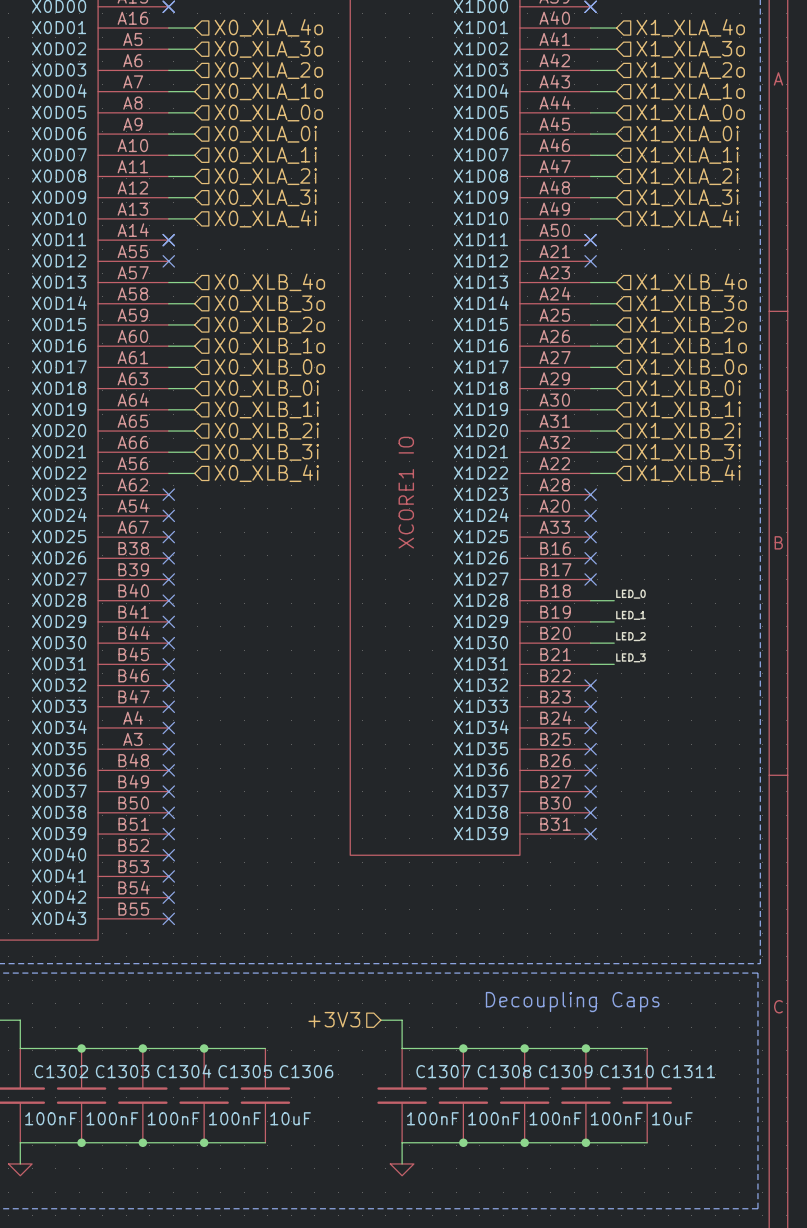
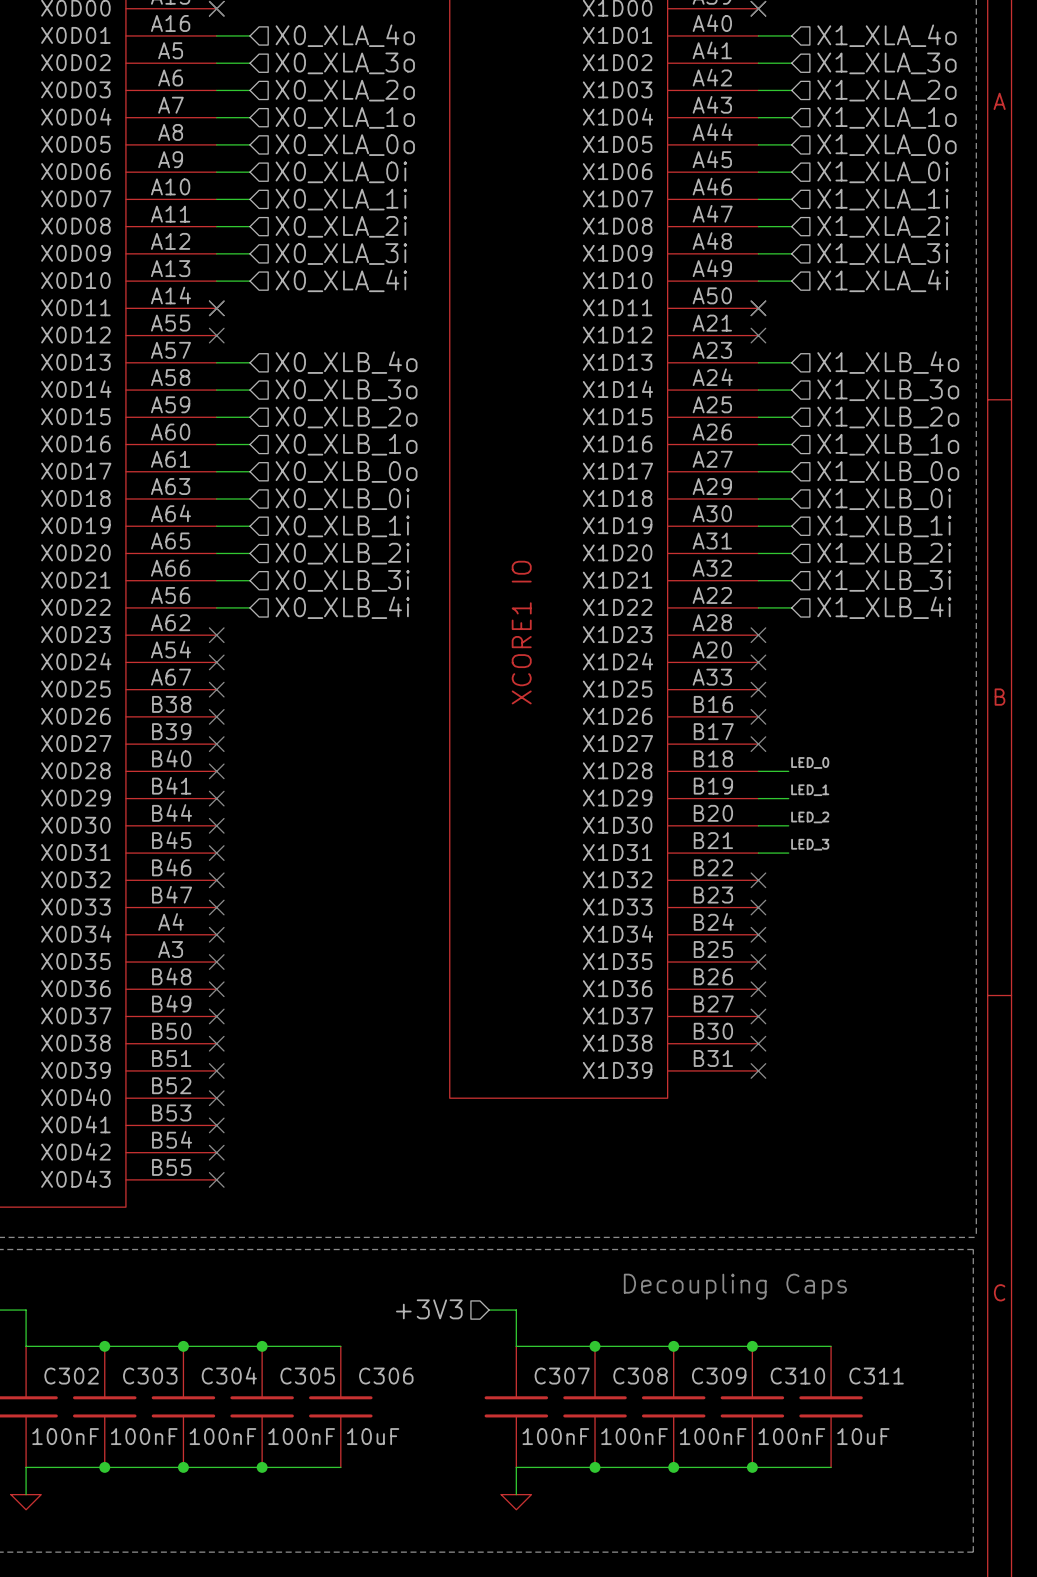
C1302 name: C1302 (61, 1071) -> C302 (71, 1376)
C1303 name: C1303 (122, 1071) -> C303 (150, 1376)
C1304 name: C1304 (184, 1071) -> C304 (229, 1375)
C1305 name: C1305 (245, 1071) -> C305 (307, 1376)
C1306 name: C1306 (306, 1071) -> C306 (386, 1376)
C1307 name: C1307 (443, 1071) -> C307 (562, 1376)
C1308 name: C1308 (504, 1071) -> C308 (640, 1376)
C1309 name: C1309 (565, 1071) -> C309 (719, 1376)
C1310 name: C1310 (626, 1071) -> C310 (797, 1376)
C1311 name: C1311 (688, 1071) -> C311 (876, 1376)

